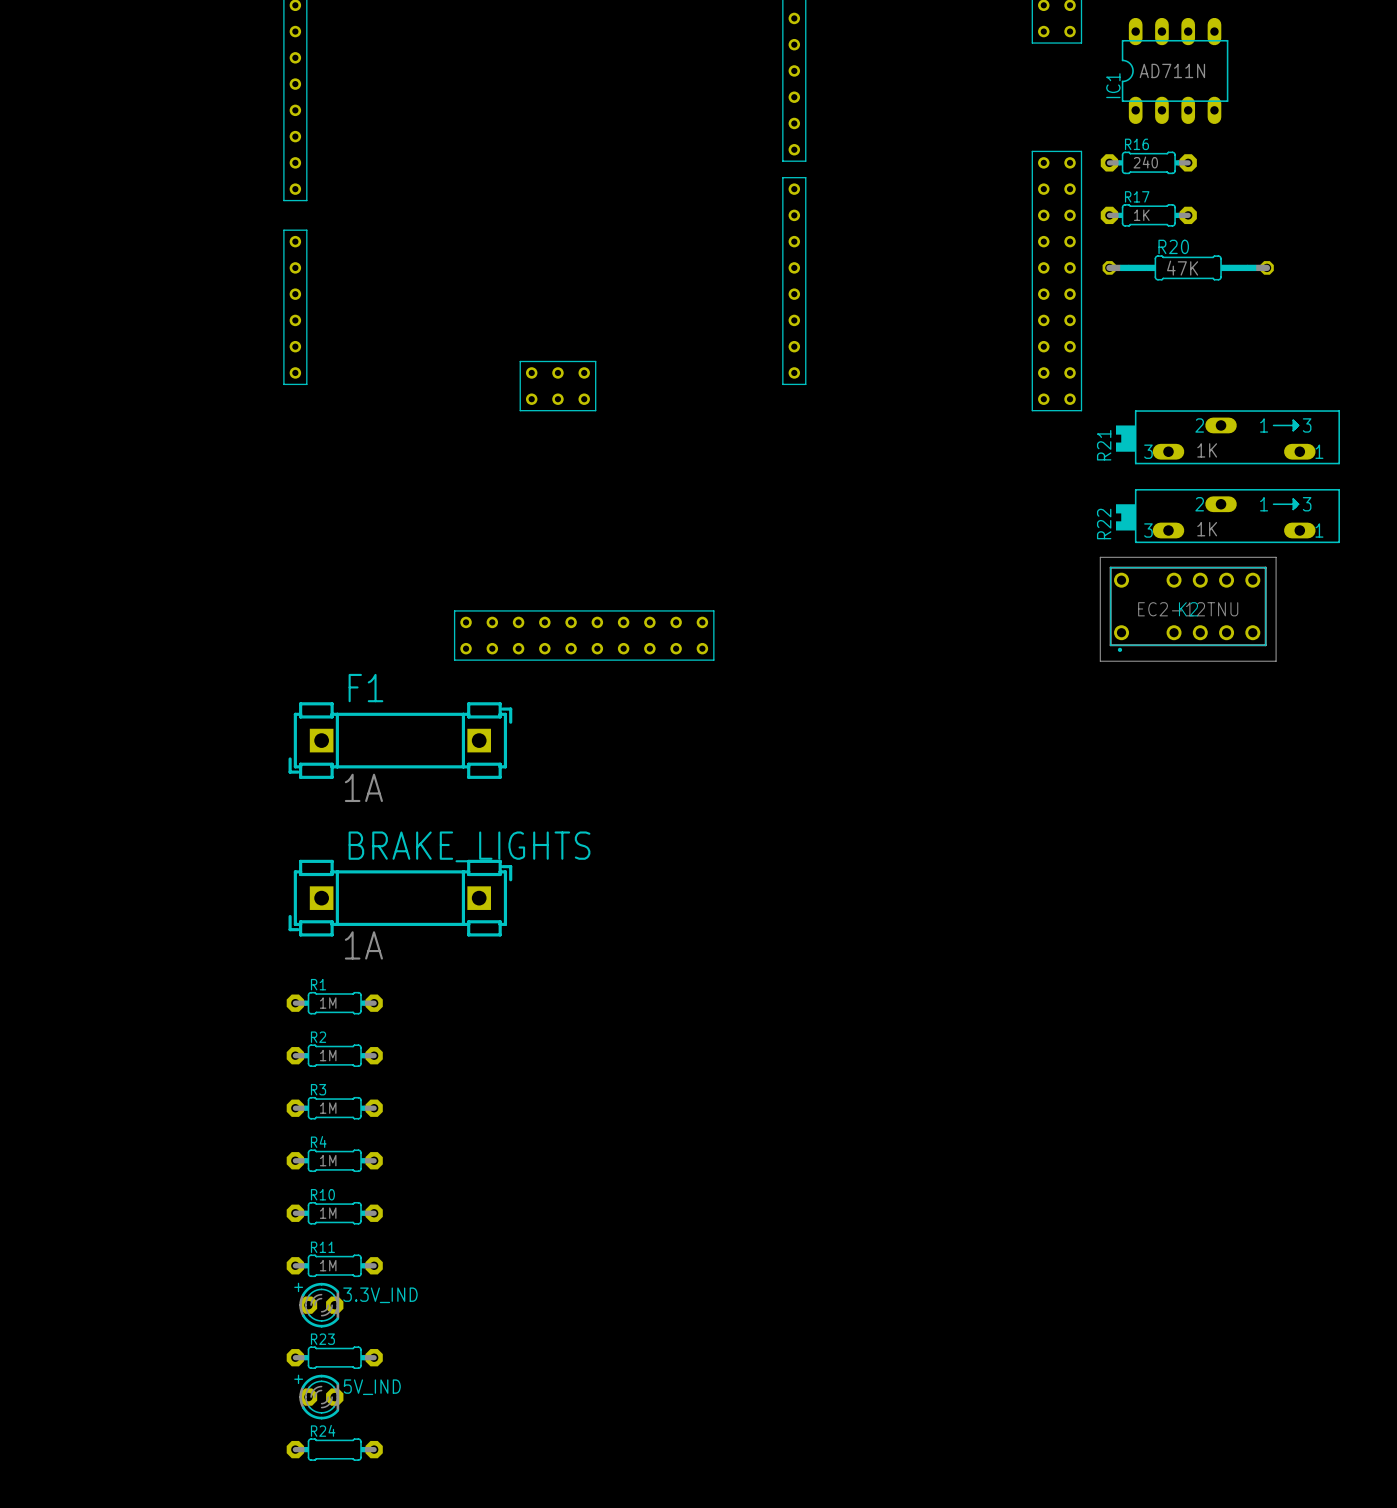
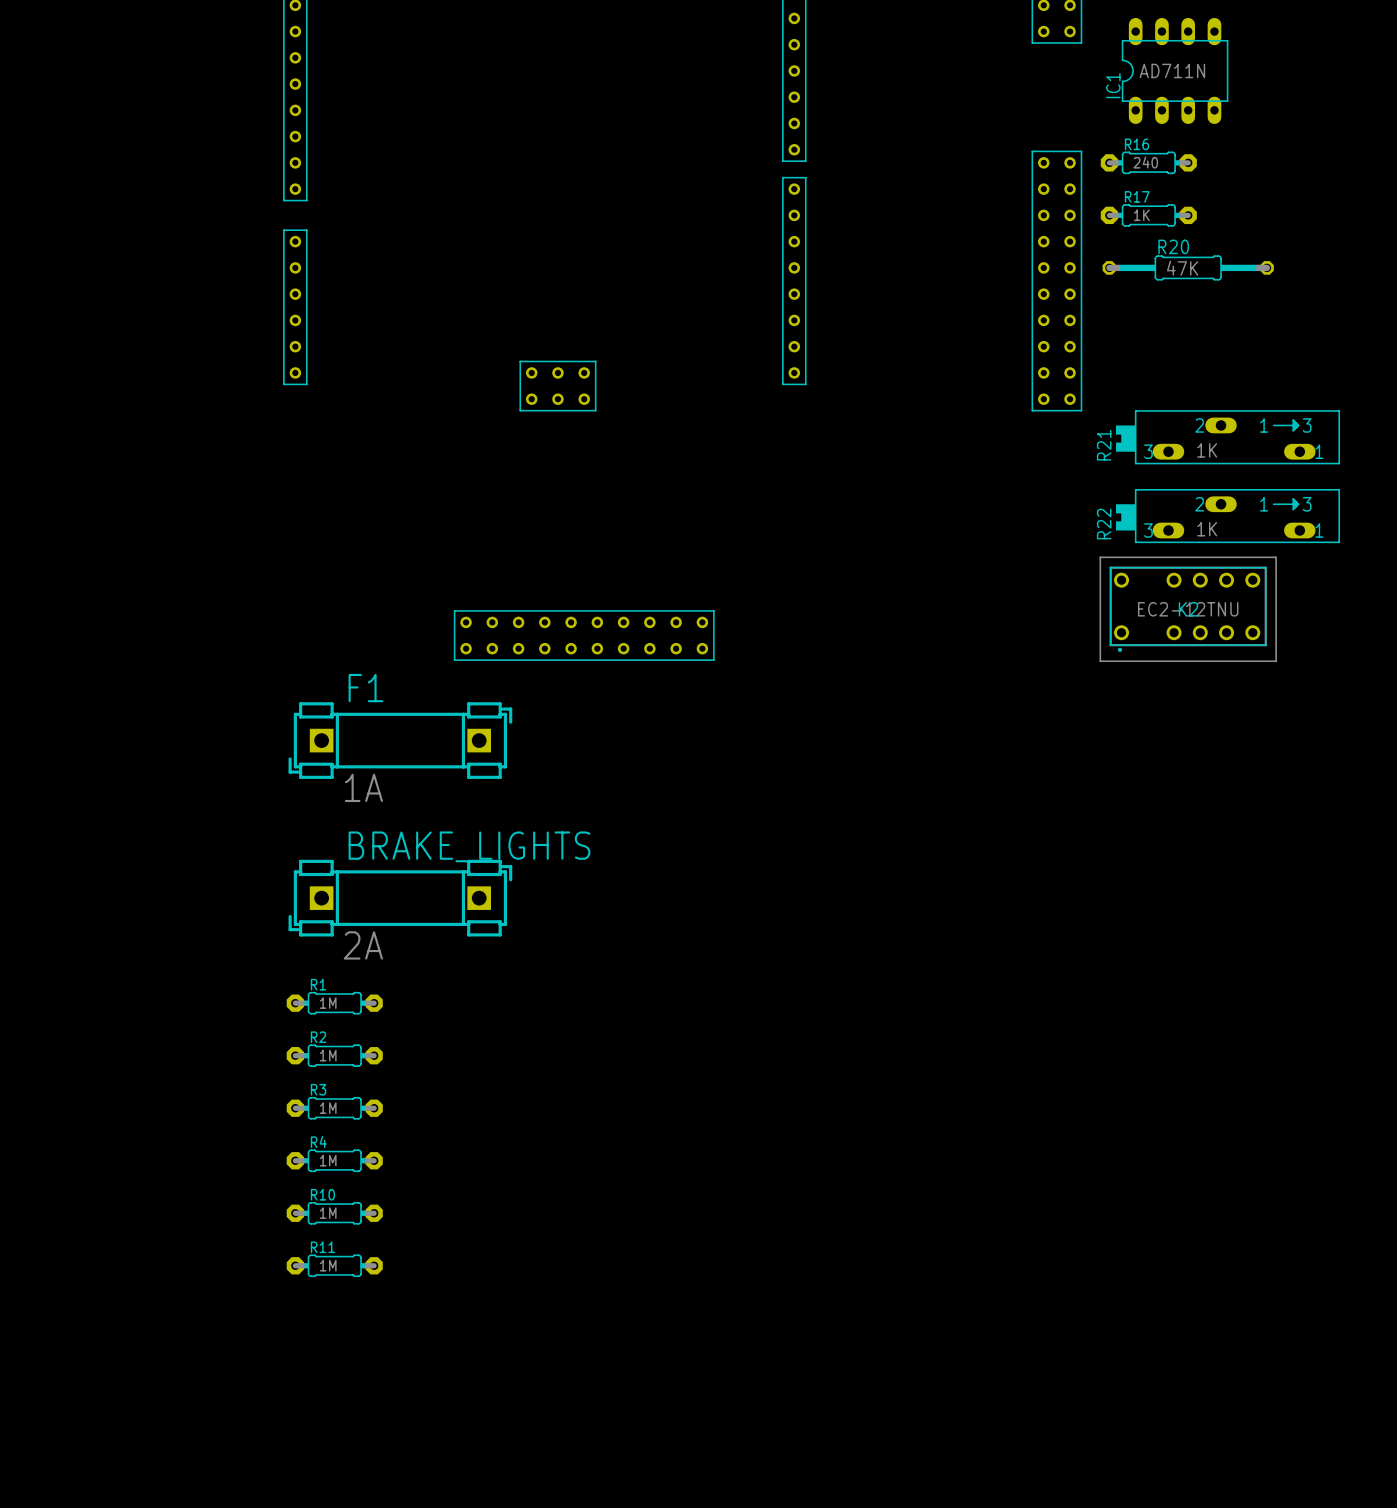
BRAKE_LIGHTS value: 1A (363, 945) -> 2A (363, 945)
3.3V_IND: (318, 1305) -> none
R23: (334, 1357) -> none
5V_IND: (318, 1397) -> none
R24: (334, 1449) -> none

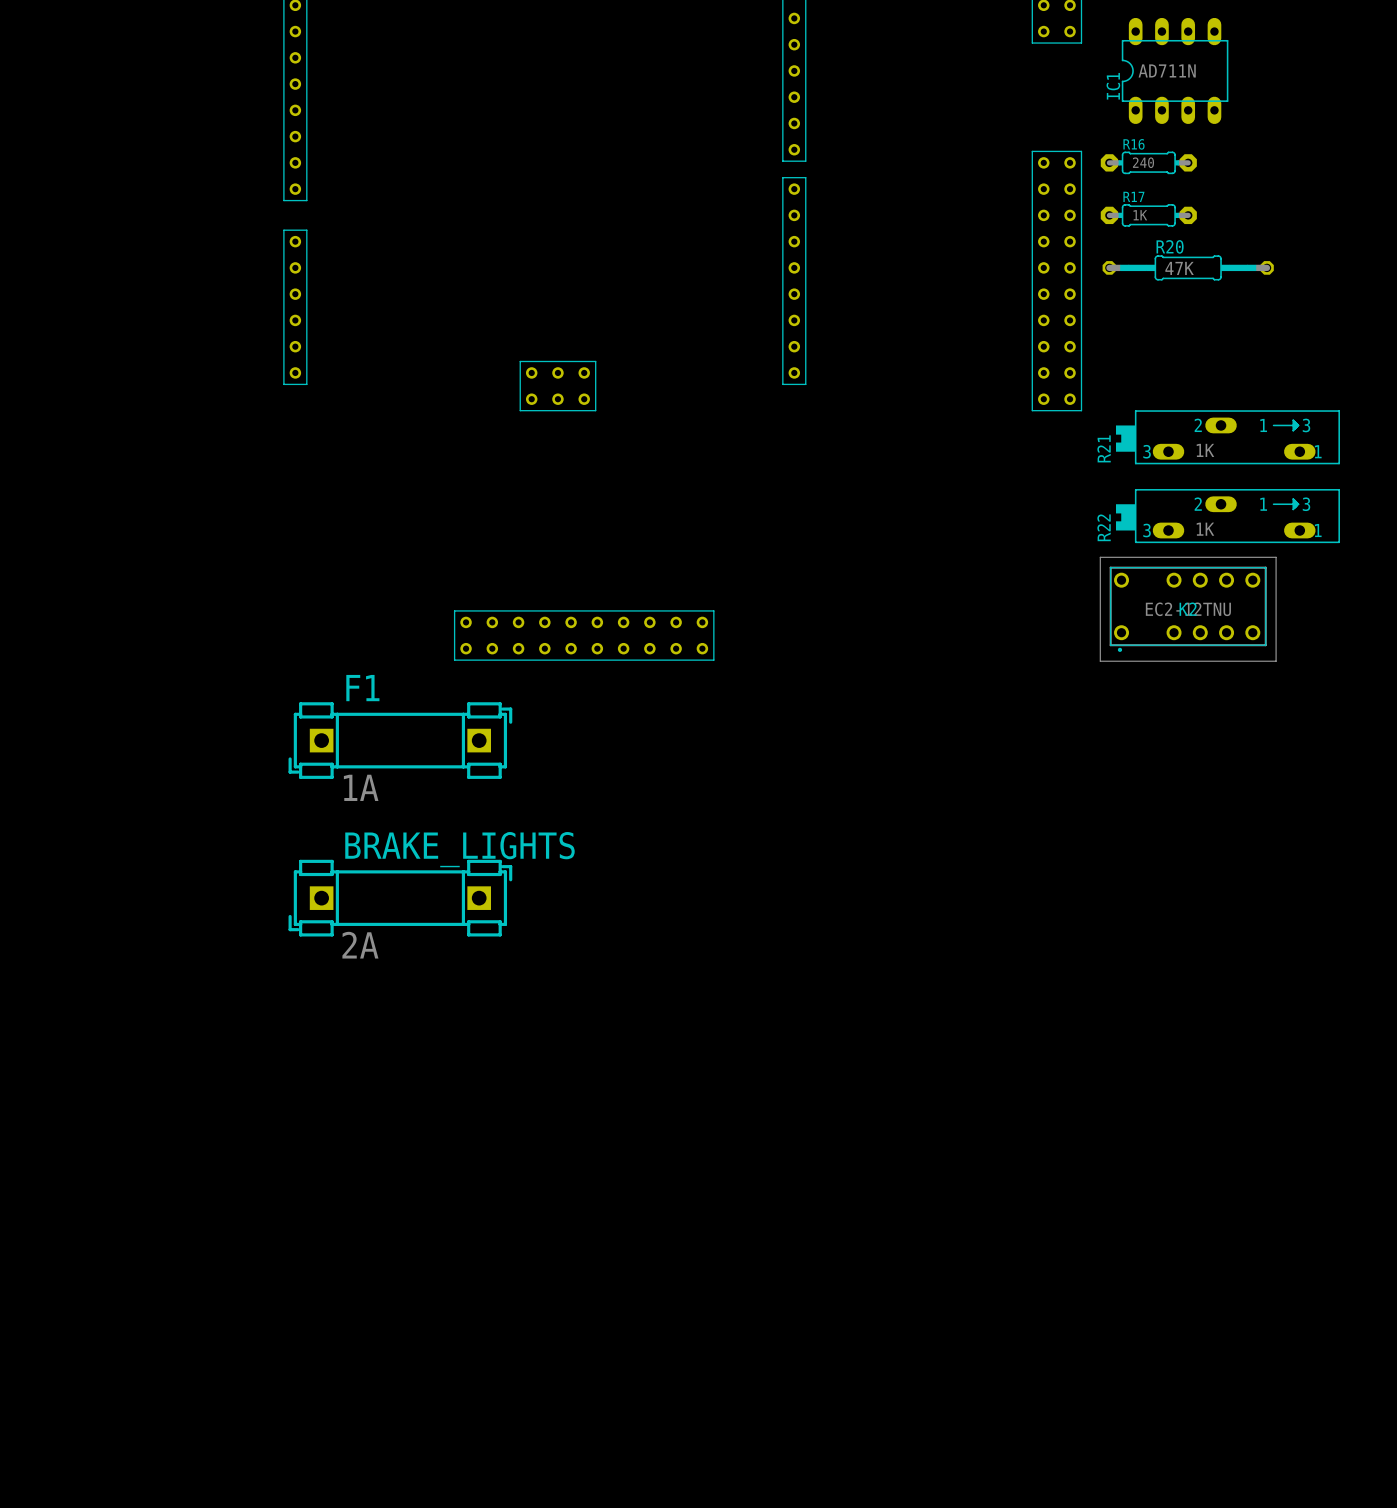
R1: 1M (334, 1003) -> none
R2: 1M (334, 1055) -> none
R3: 1M (334, 1108) -> none
R4: 1M (334, 1160) -> none
R10: 1M (334, 1213) -> none
R11: 1M (334, 1265) -> none

